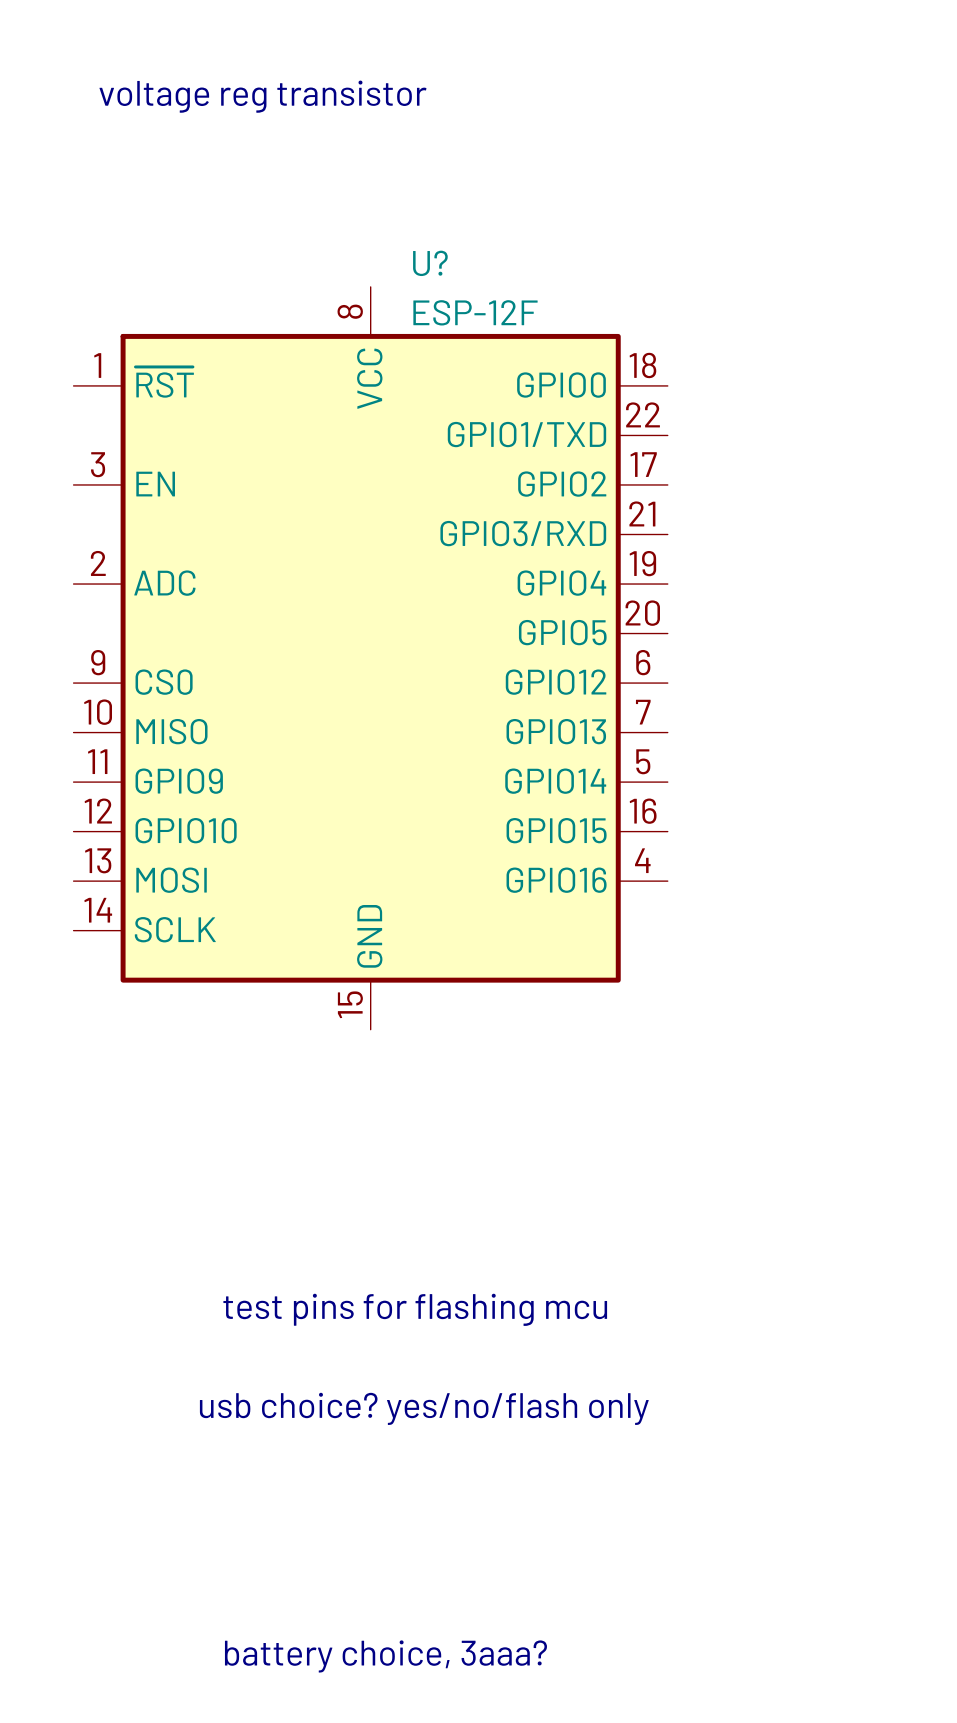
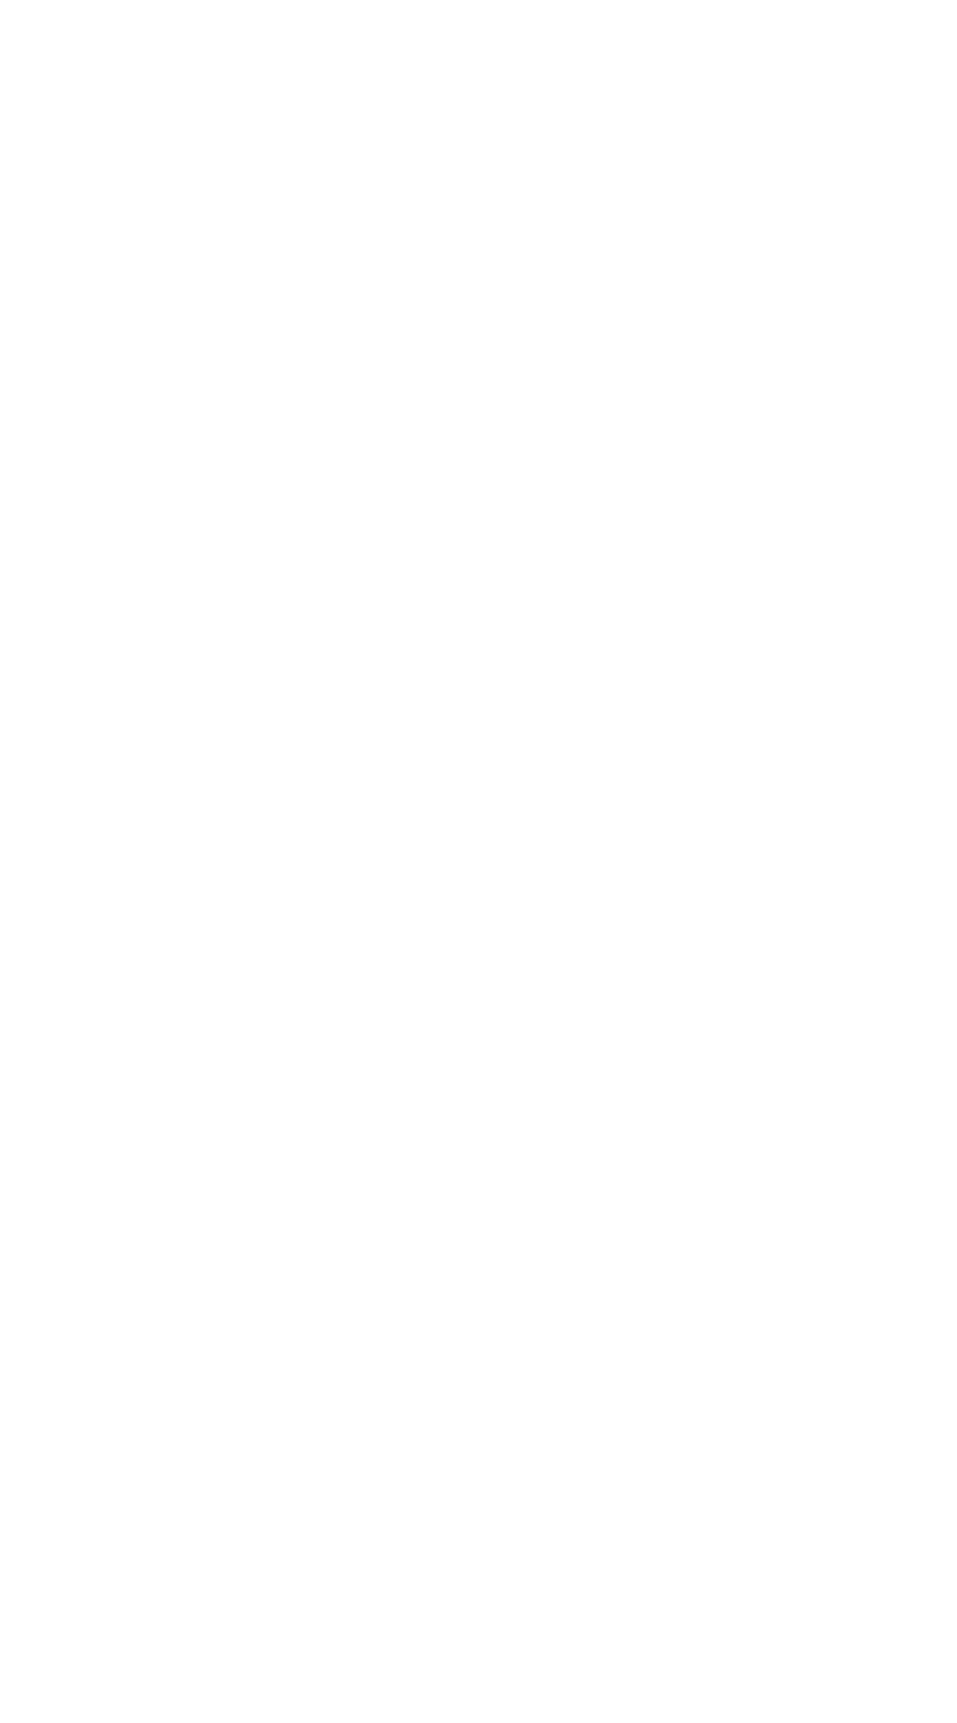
text: voltage reg transistor (262, 96) -> none
U?: ESP-12F (370, 658) -> none
text: test pins for flashing mcu (415, 1309) -> none
text: usb choice? yes/no/flash only (424, 1408) -> none
text: battery choice, 3aaa? (385, 1656) -> none

